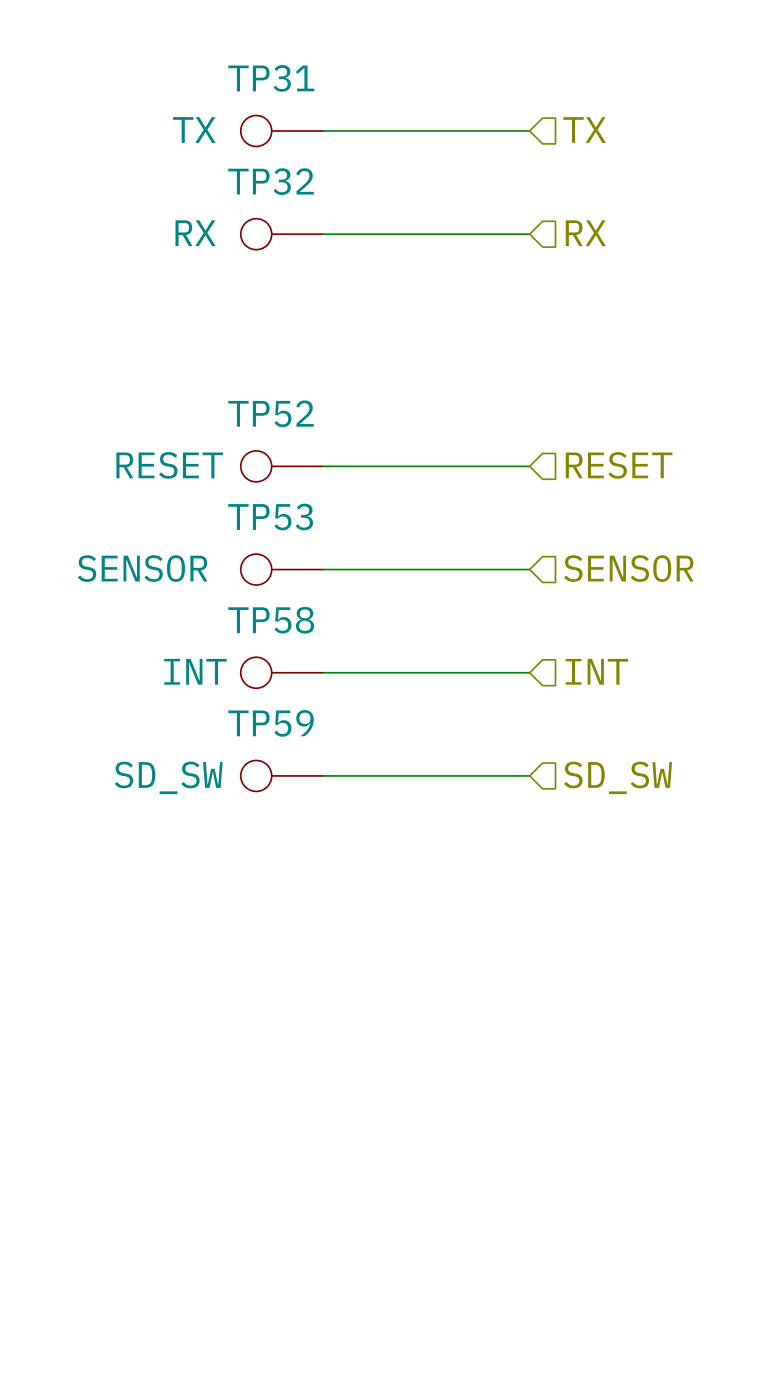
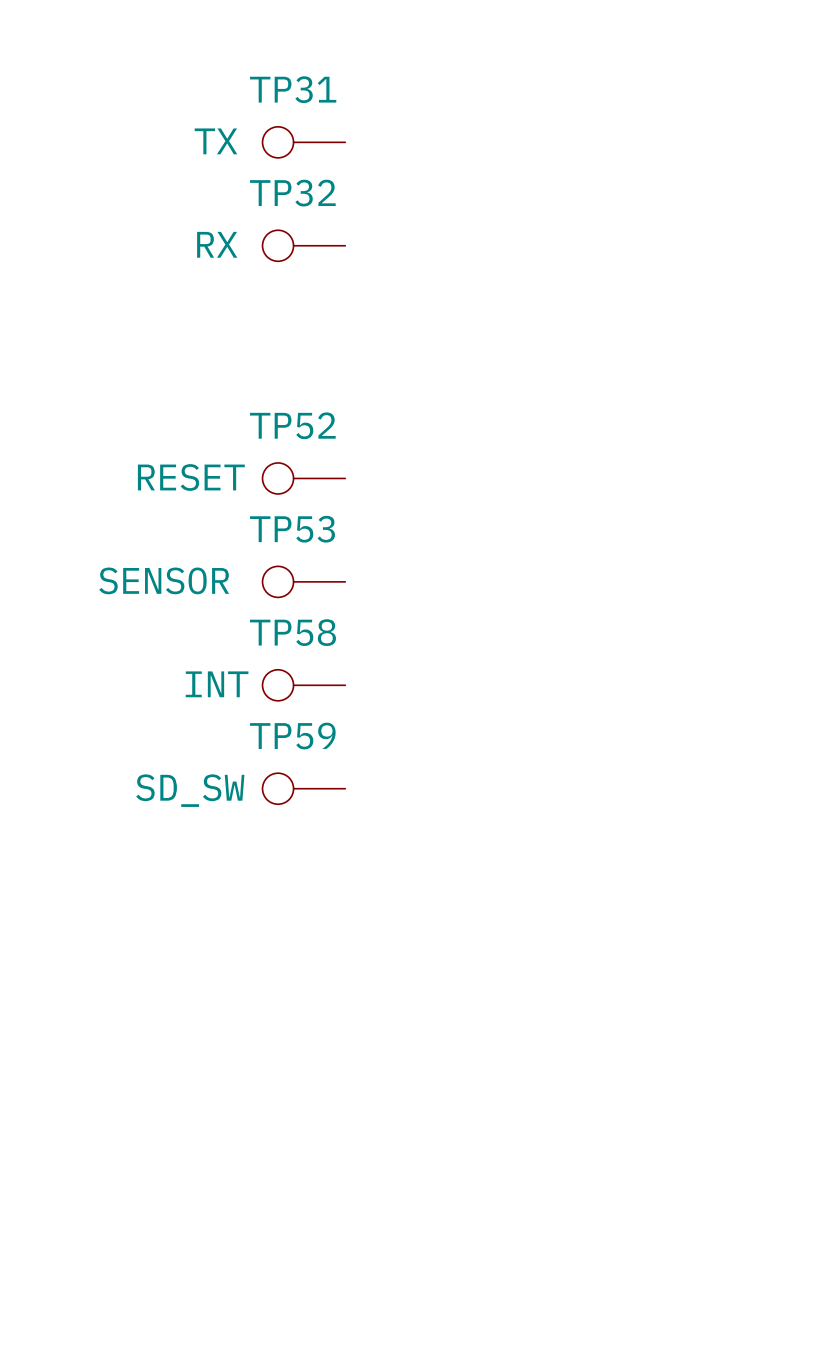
wire: (323, 130) (529, 130) -> none
hierarchical label: TX (584, 130) -> none
hierarchical label: RX (585, 233) -> none
wire: (323, 234) (529, 234) -> none
hierarchical label: RESET (619, 465) -> none
wire: (323, 466) (529, 466) -> none
hierarchical label: SENSOR (628, 568) -> none
wire: (323, 569) (529, 569) -> none
hierarchical label: INT (596, 671) -> none
wire: (323, 672) (529, 672) -> none
wire: (323, 775) (529, 775) -> none
hierarchical label: SD_SW (618, 777) -> none

